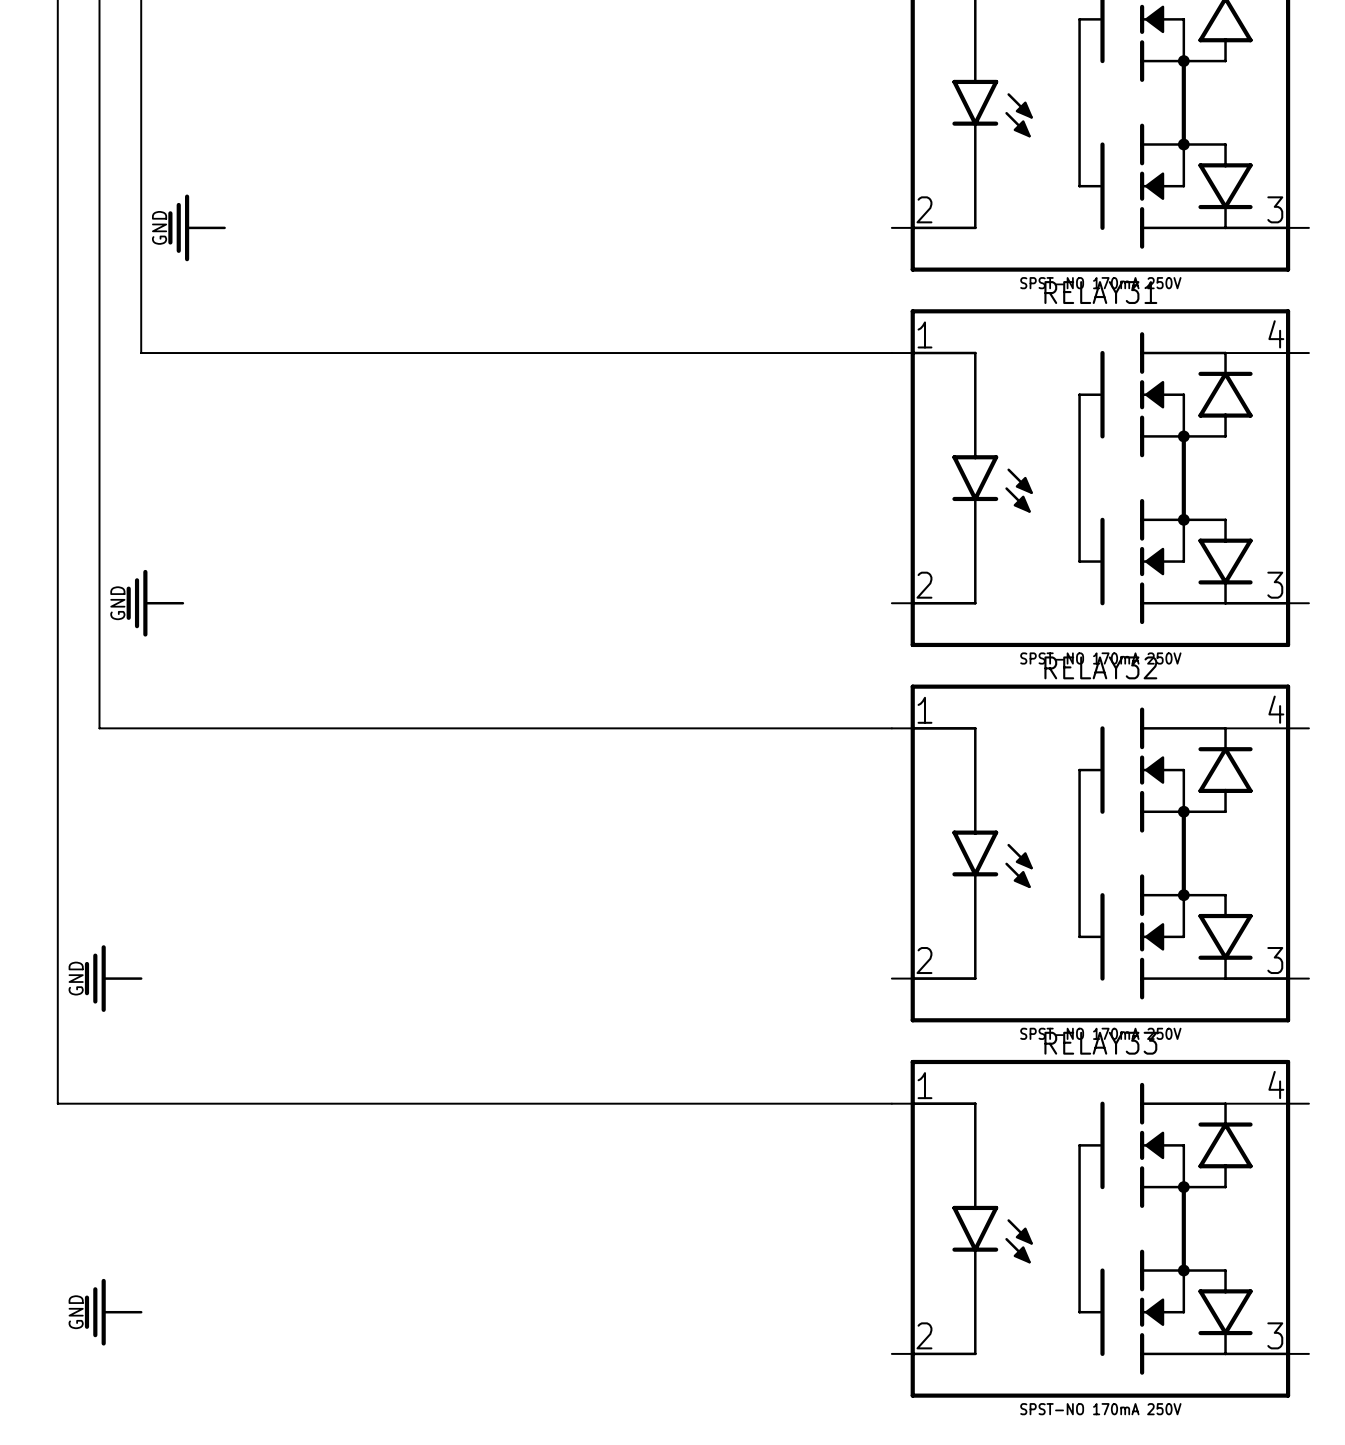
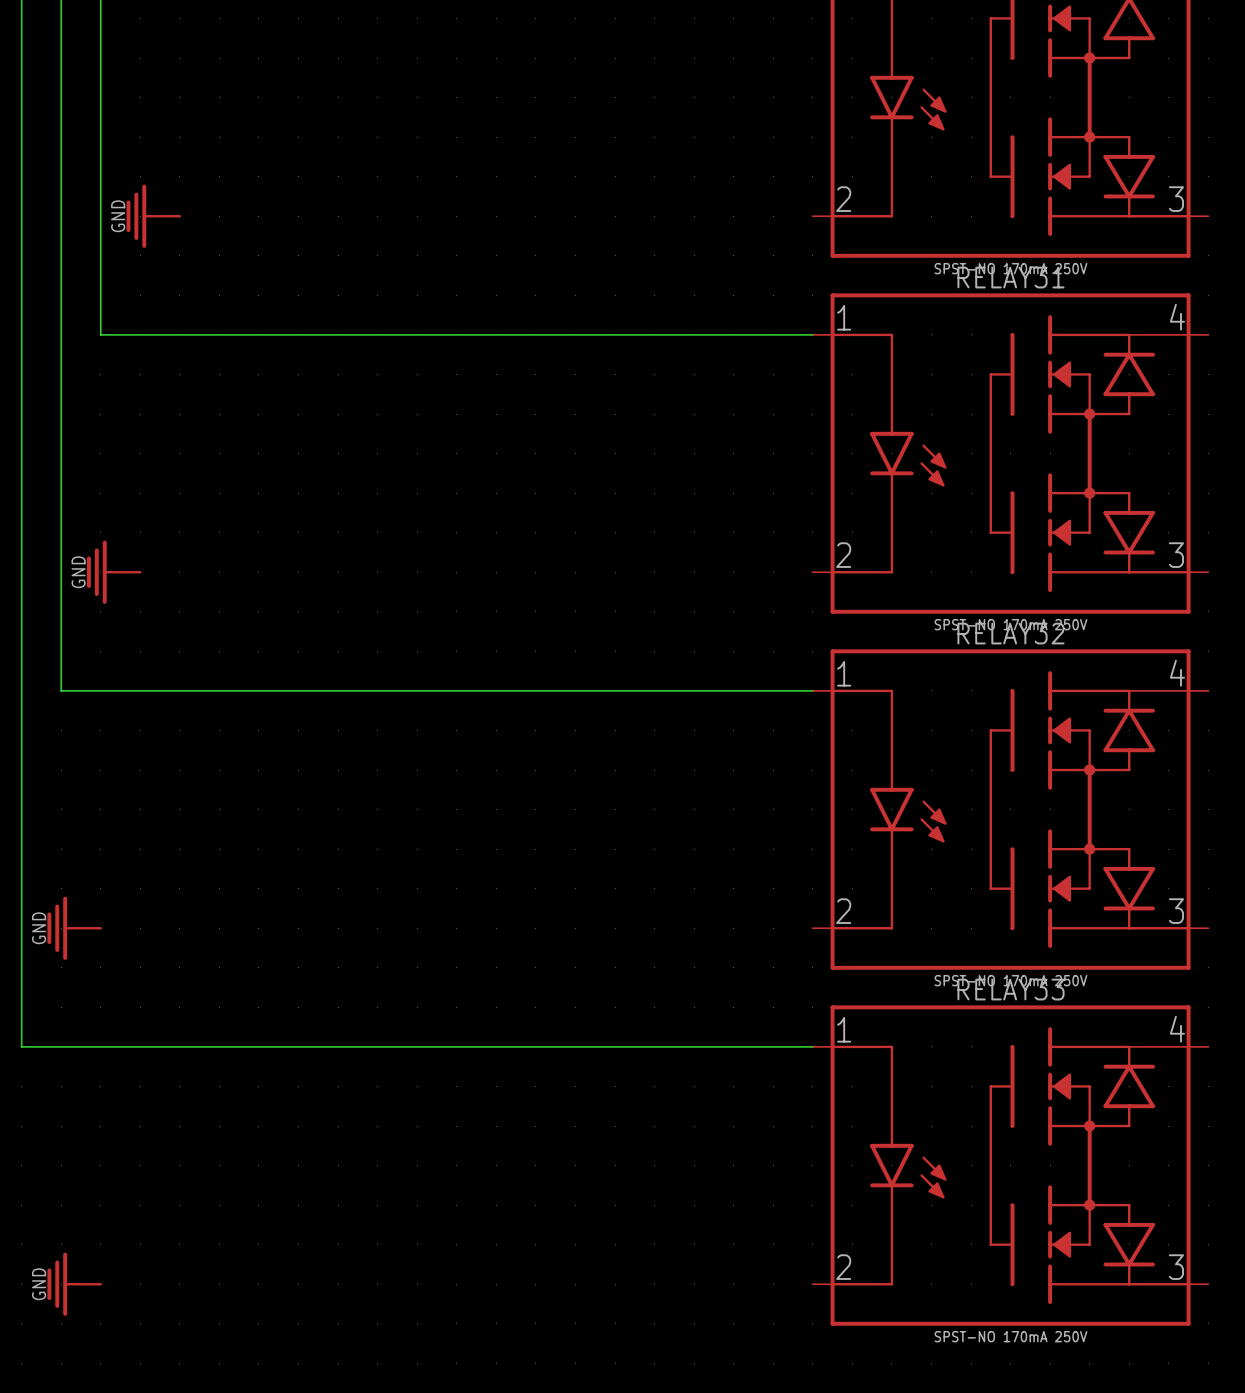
power symbol position: (113, 1312) -> (74, 1284)

